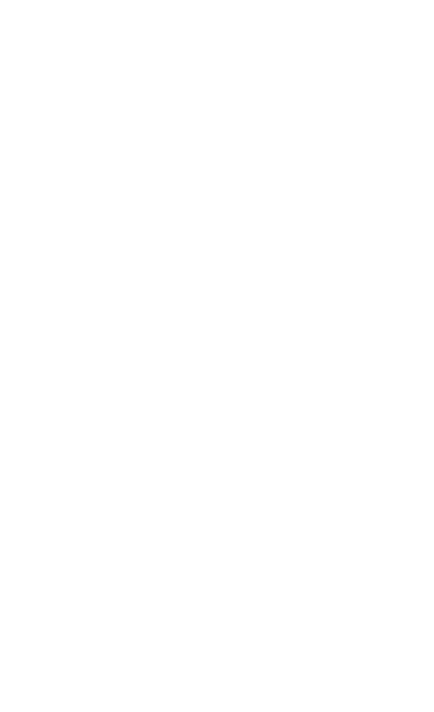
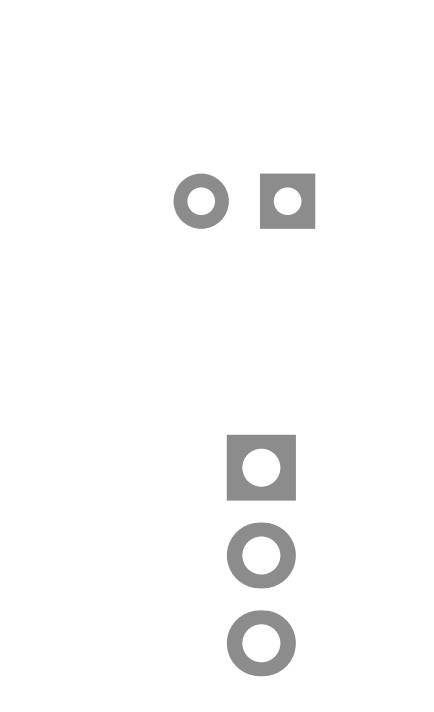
part: none -> (244, 201)
part: none -> (261, 555)

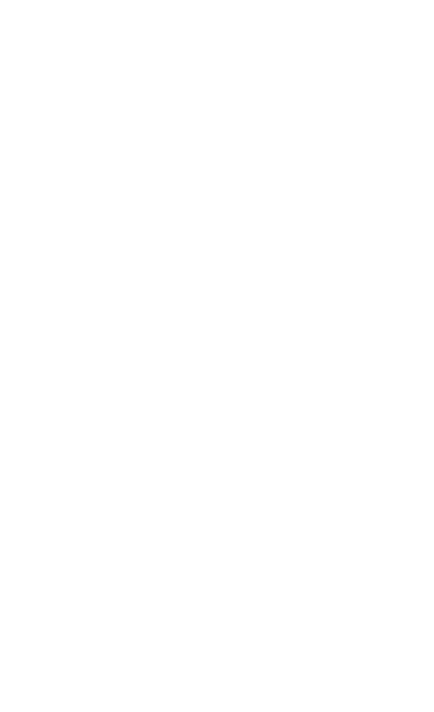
part: (244, 201) -> none
part: (261, 555) -> none

